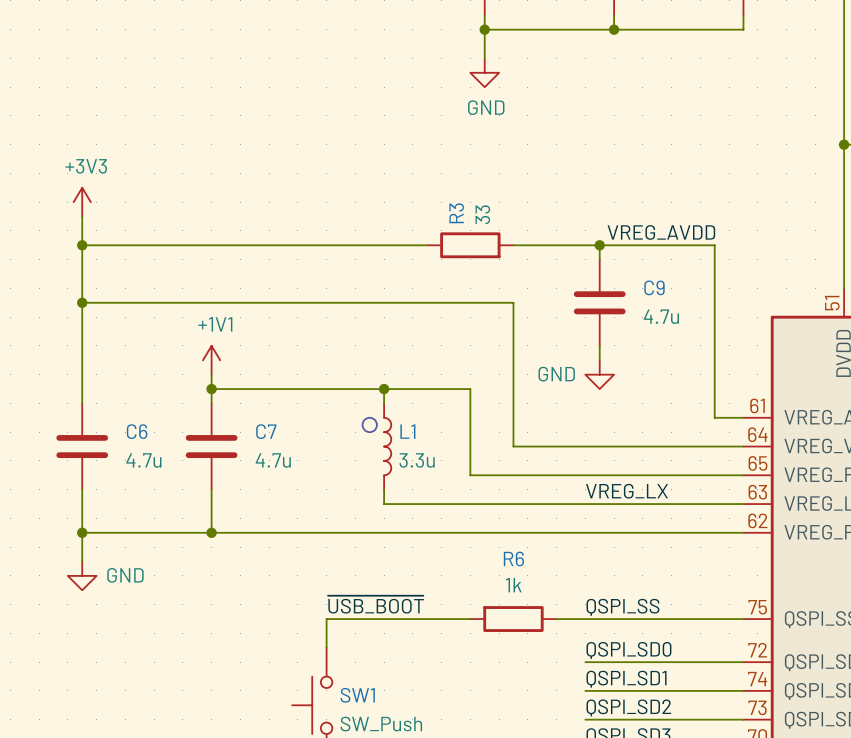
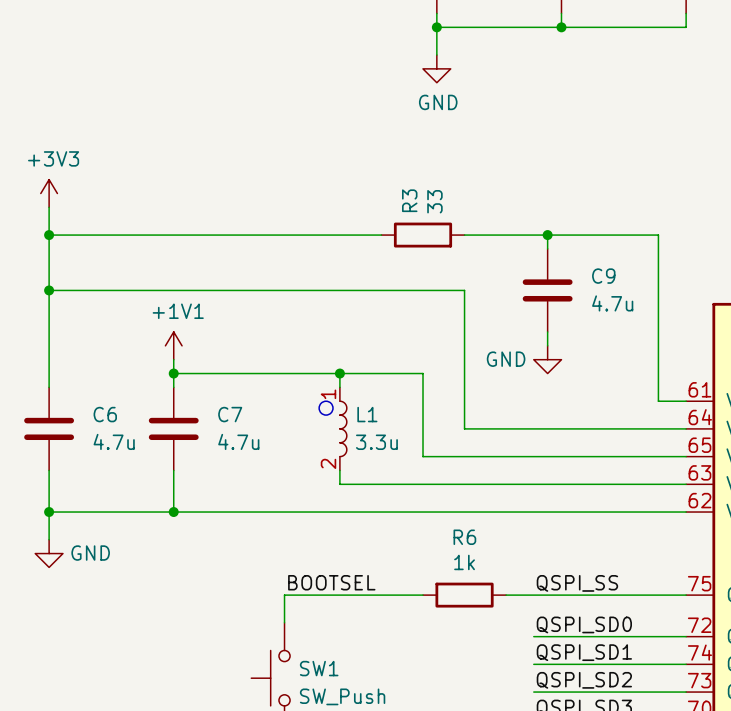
label: VREG_AVDD (661, 232) -> none
L1 pin number: none -> 1 (328, 394)
L1 pin number: none -> 2 (328, 463)
label: VREG_LX (626, 491) -> none
label: ~{USB_BOOT} (375, 604) -> BOOTSEL (331, 582)

